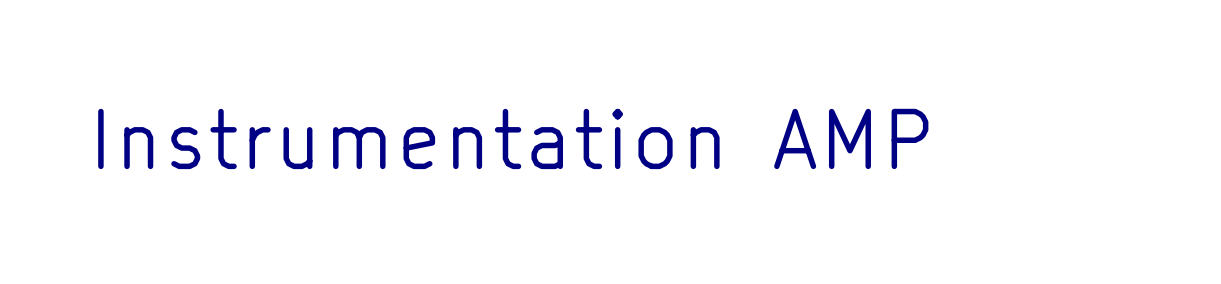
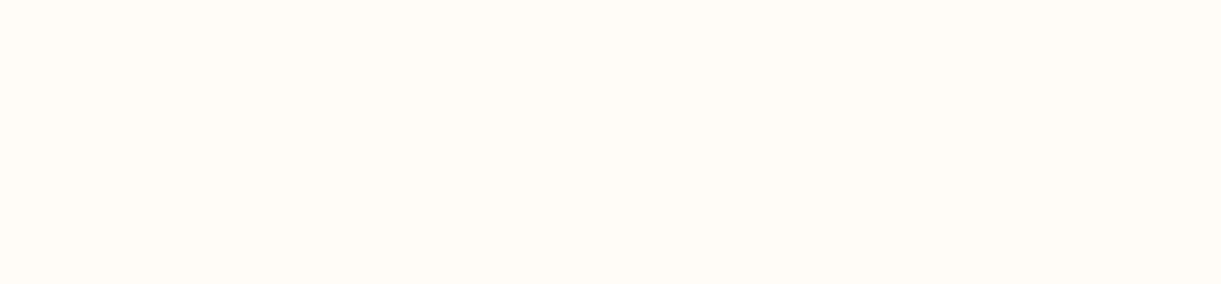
text: Instrumentation AMP (513, 138) -> none

